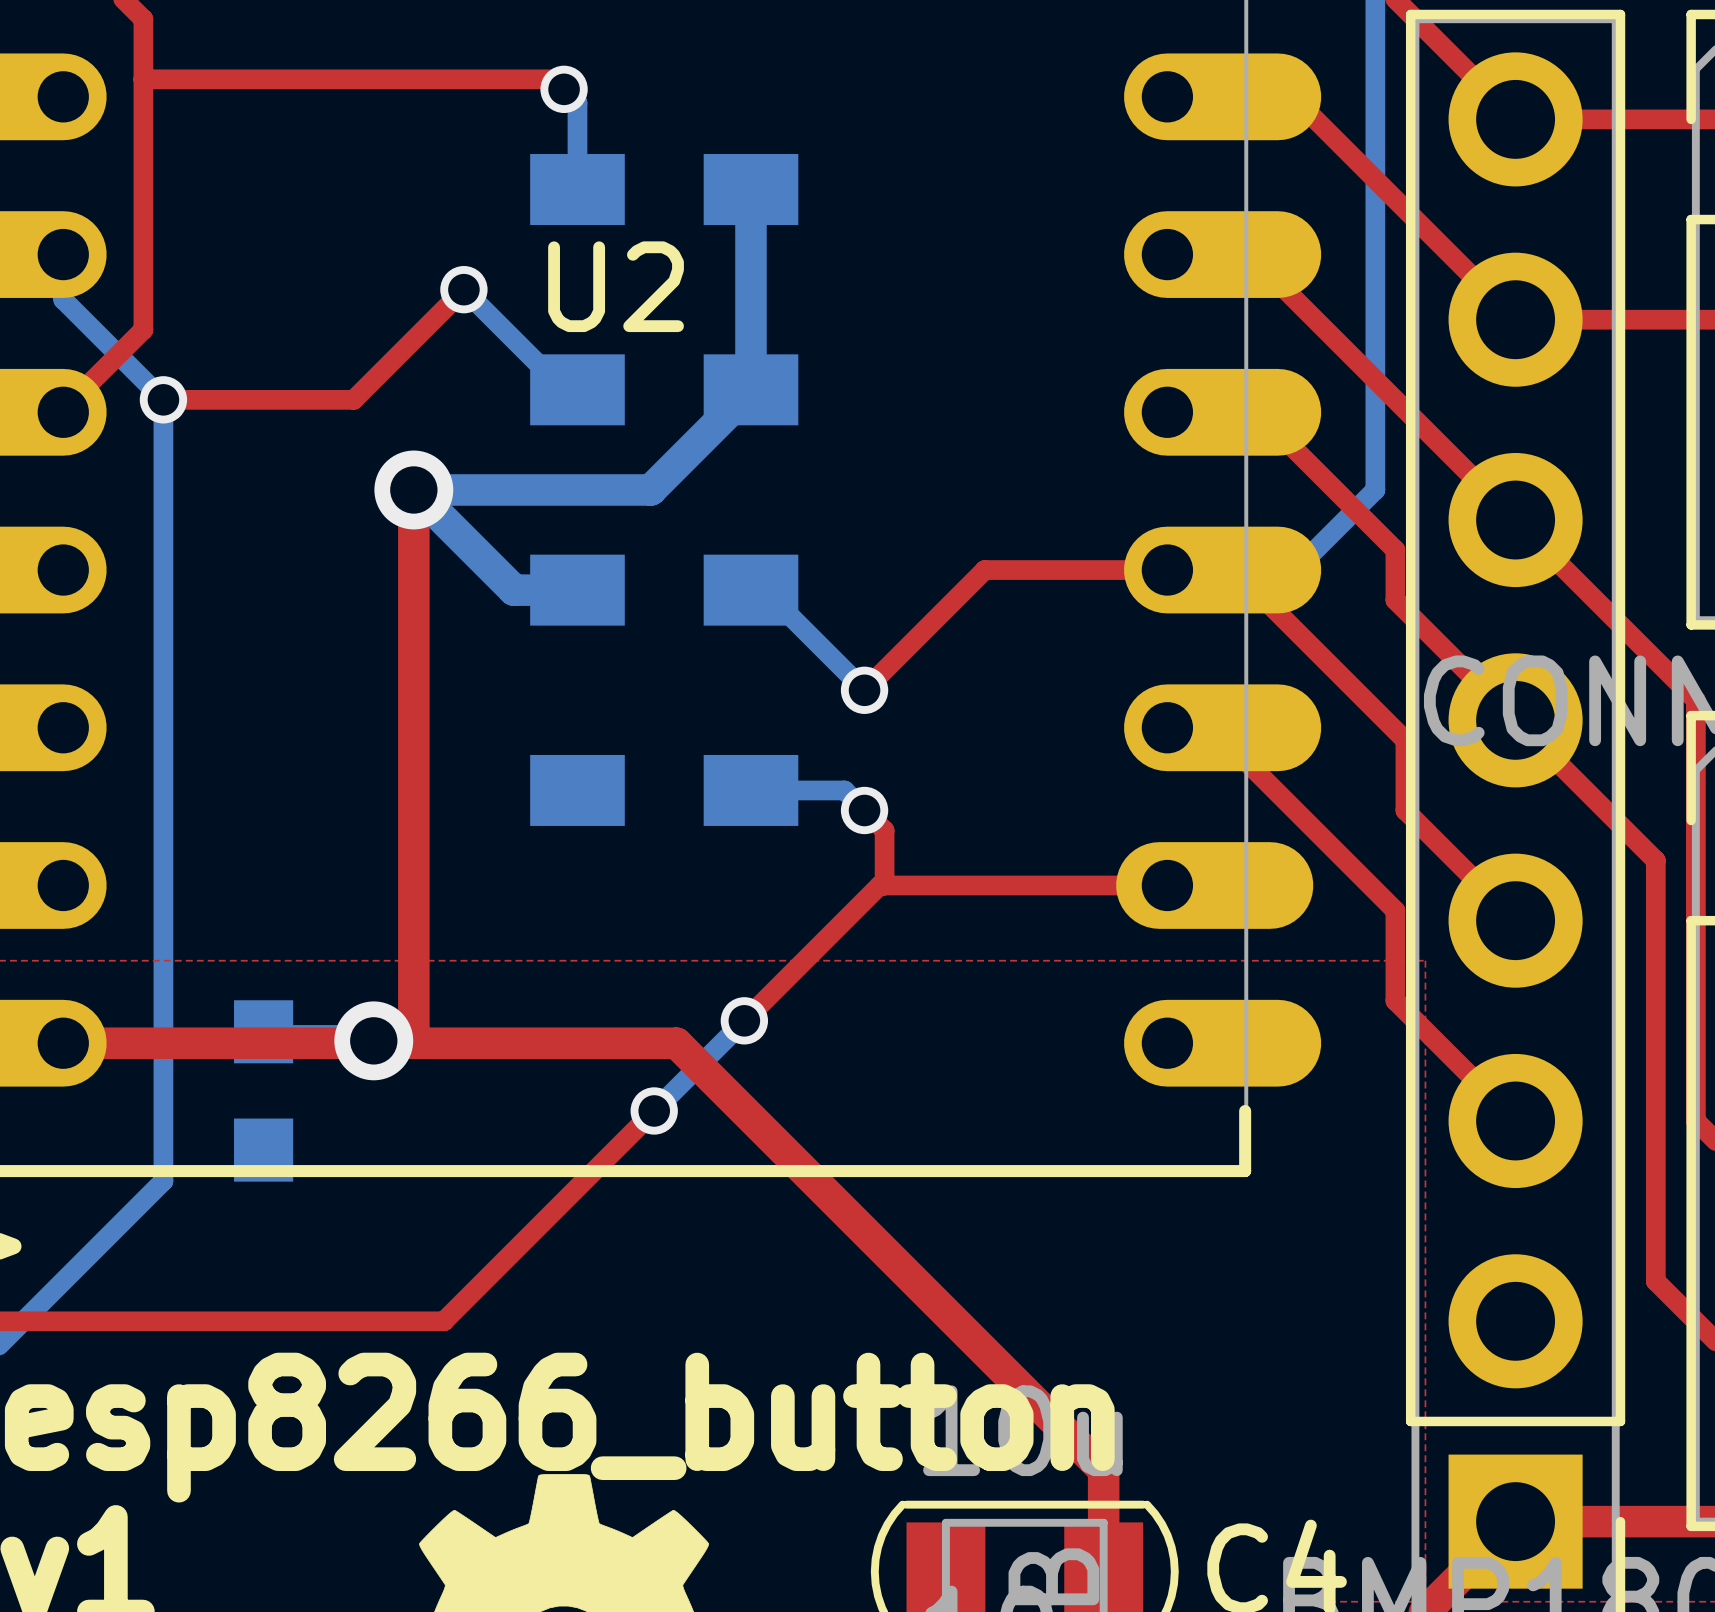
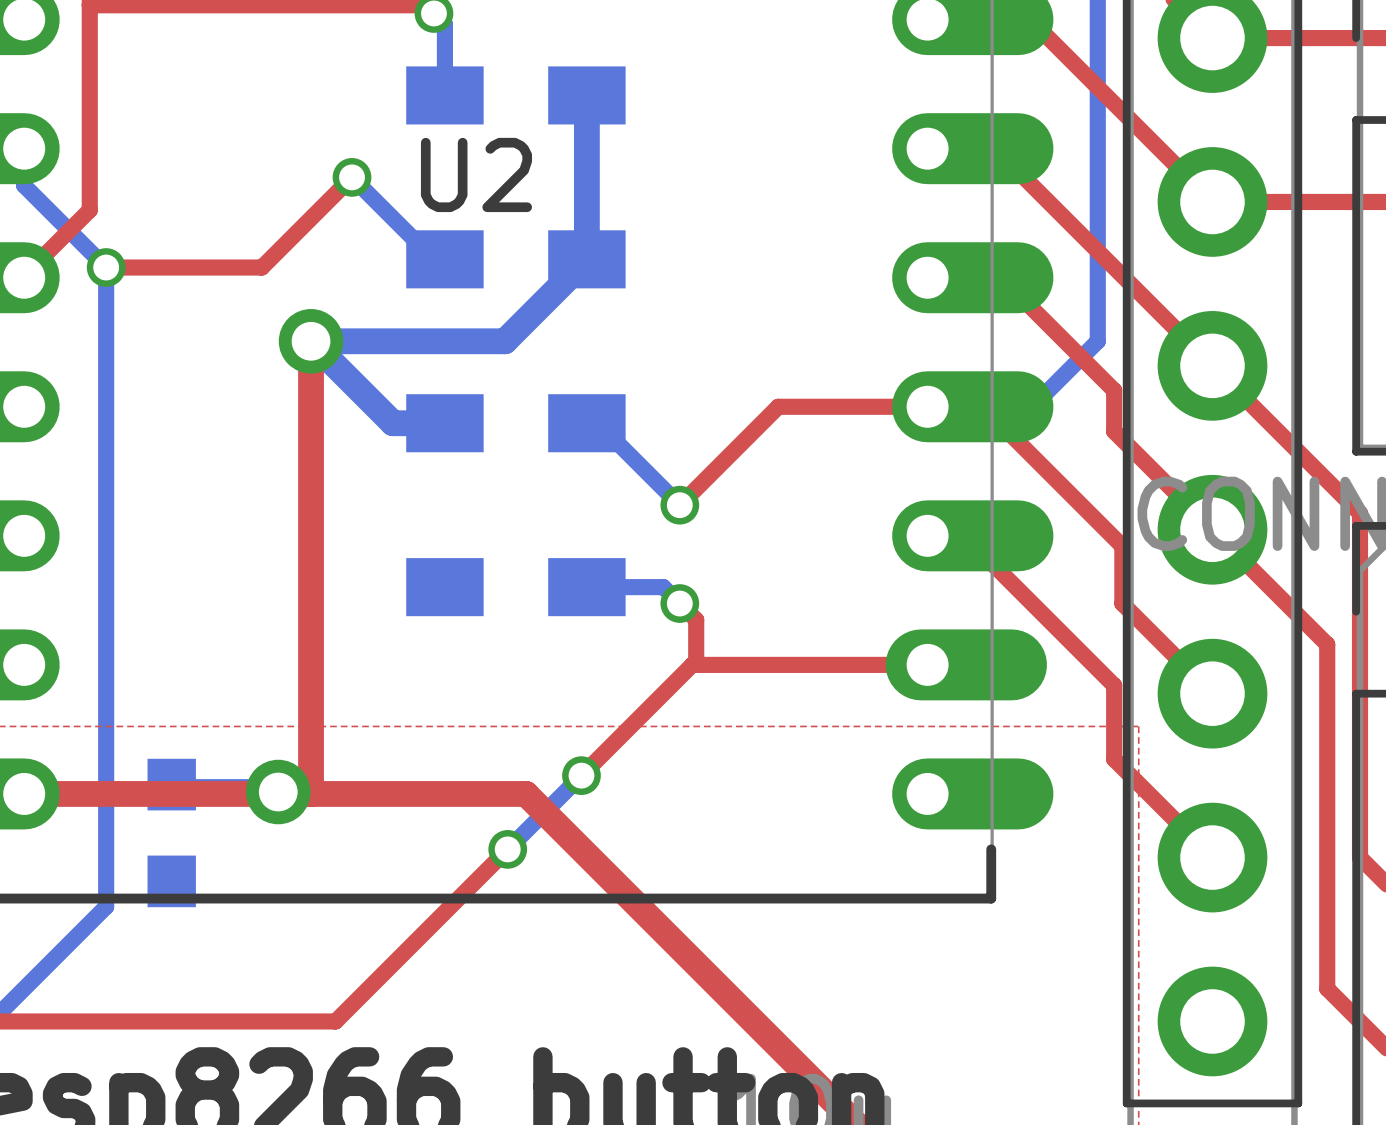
part position: (263, 1090) -> (171, 832)

